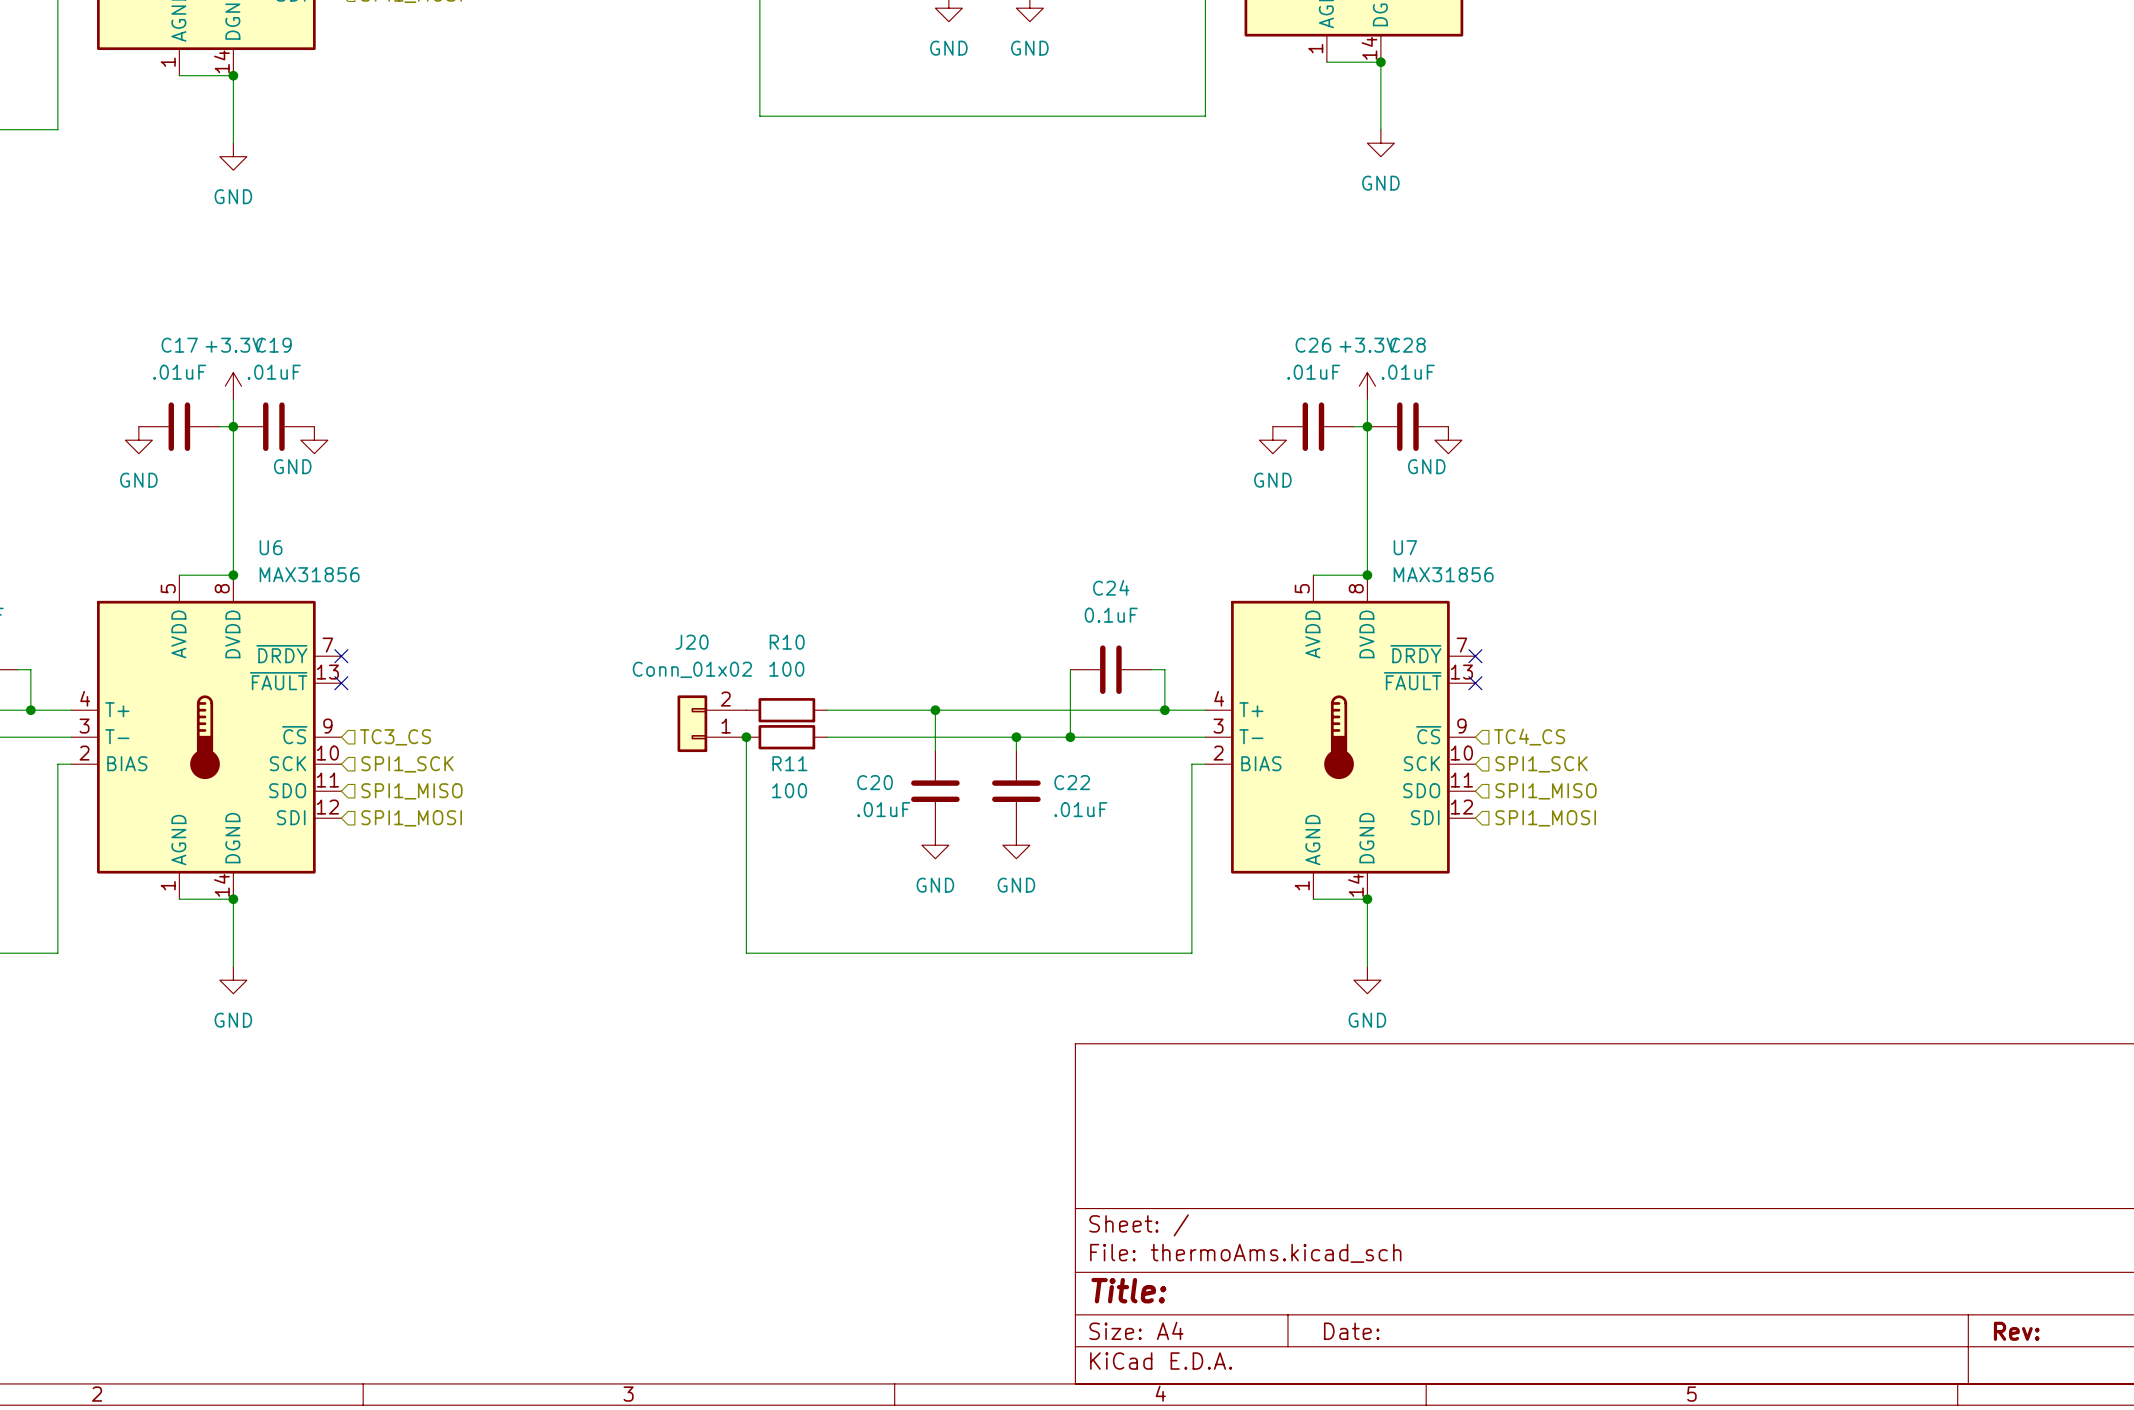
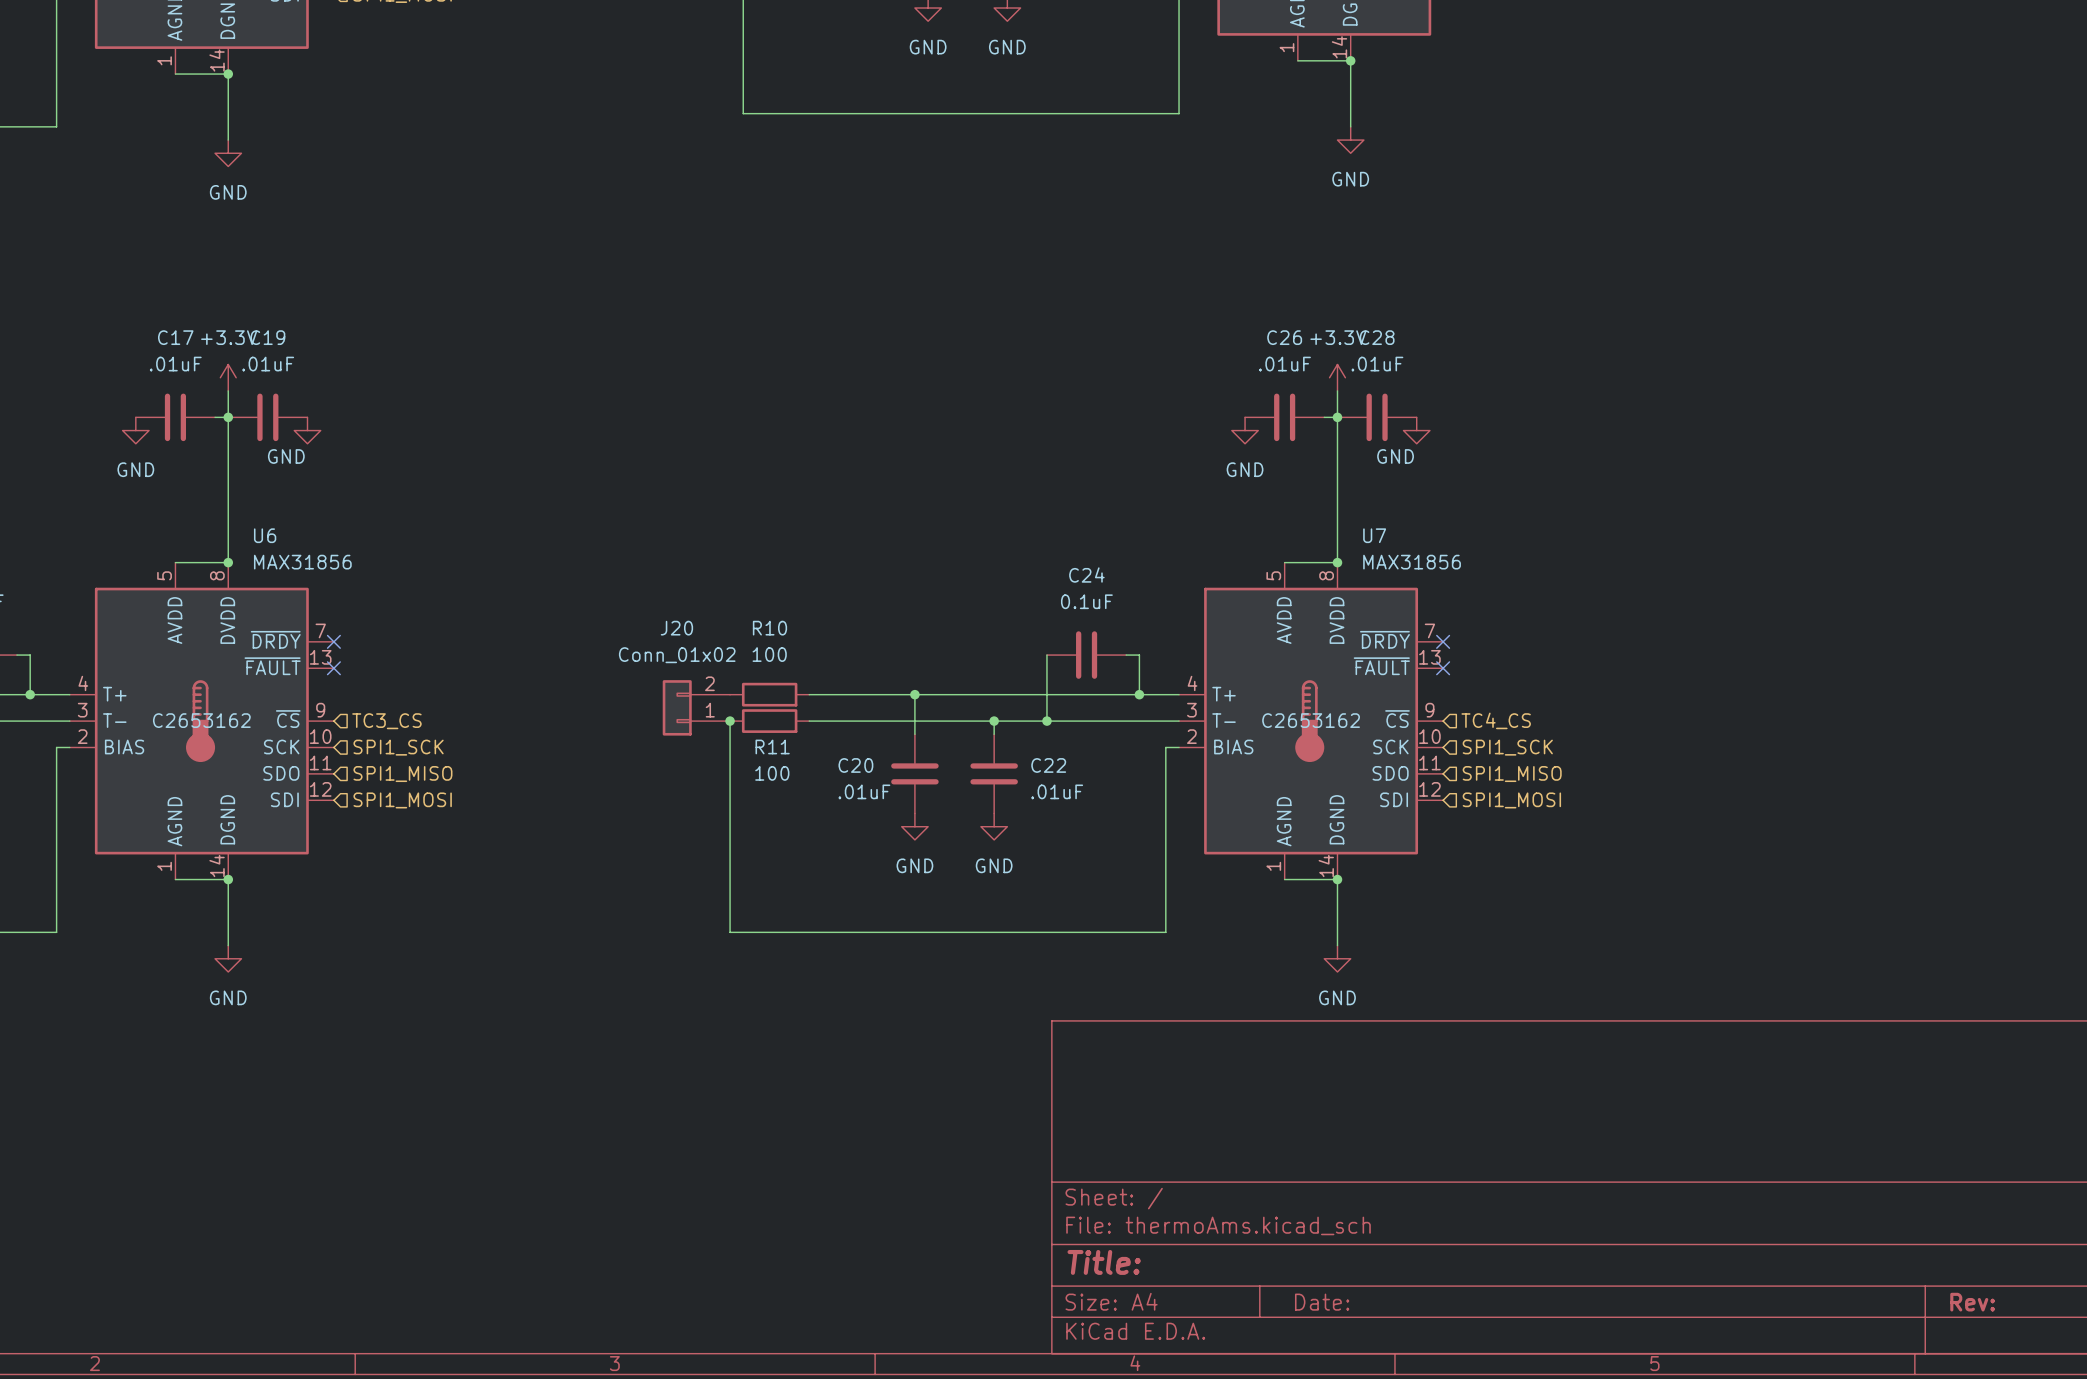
U6 text: none -> C2653162 (201, 720)
U7 text: none -> C2653162 (1311, 720)

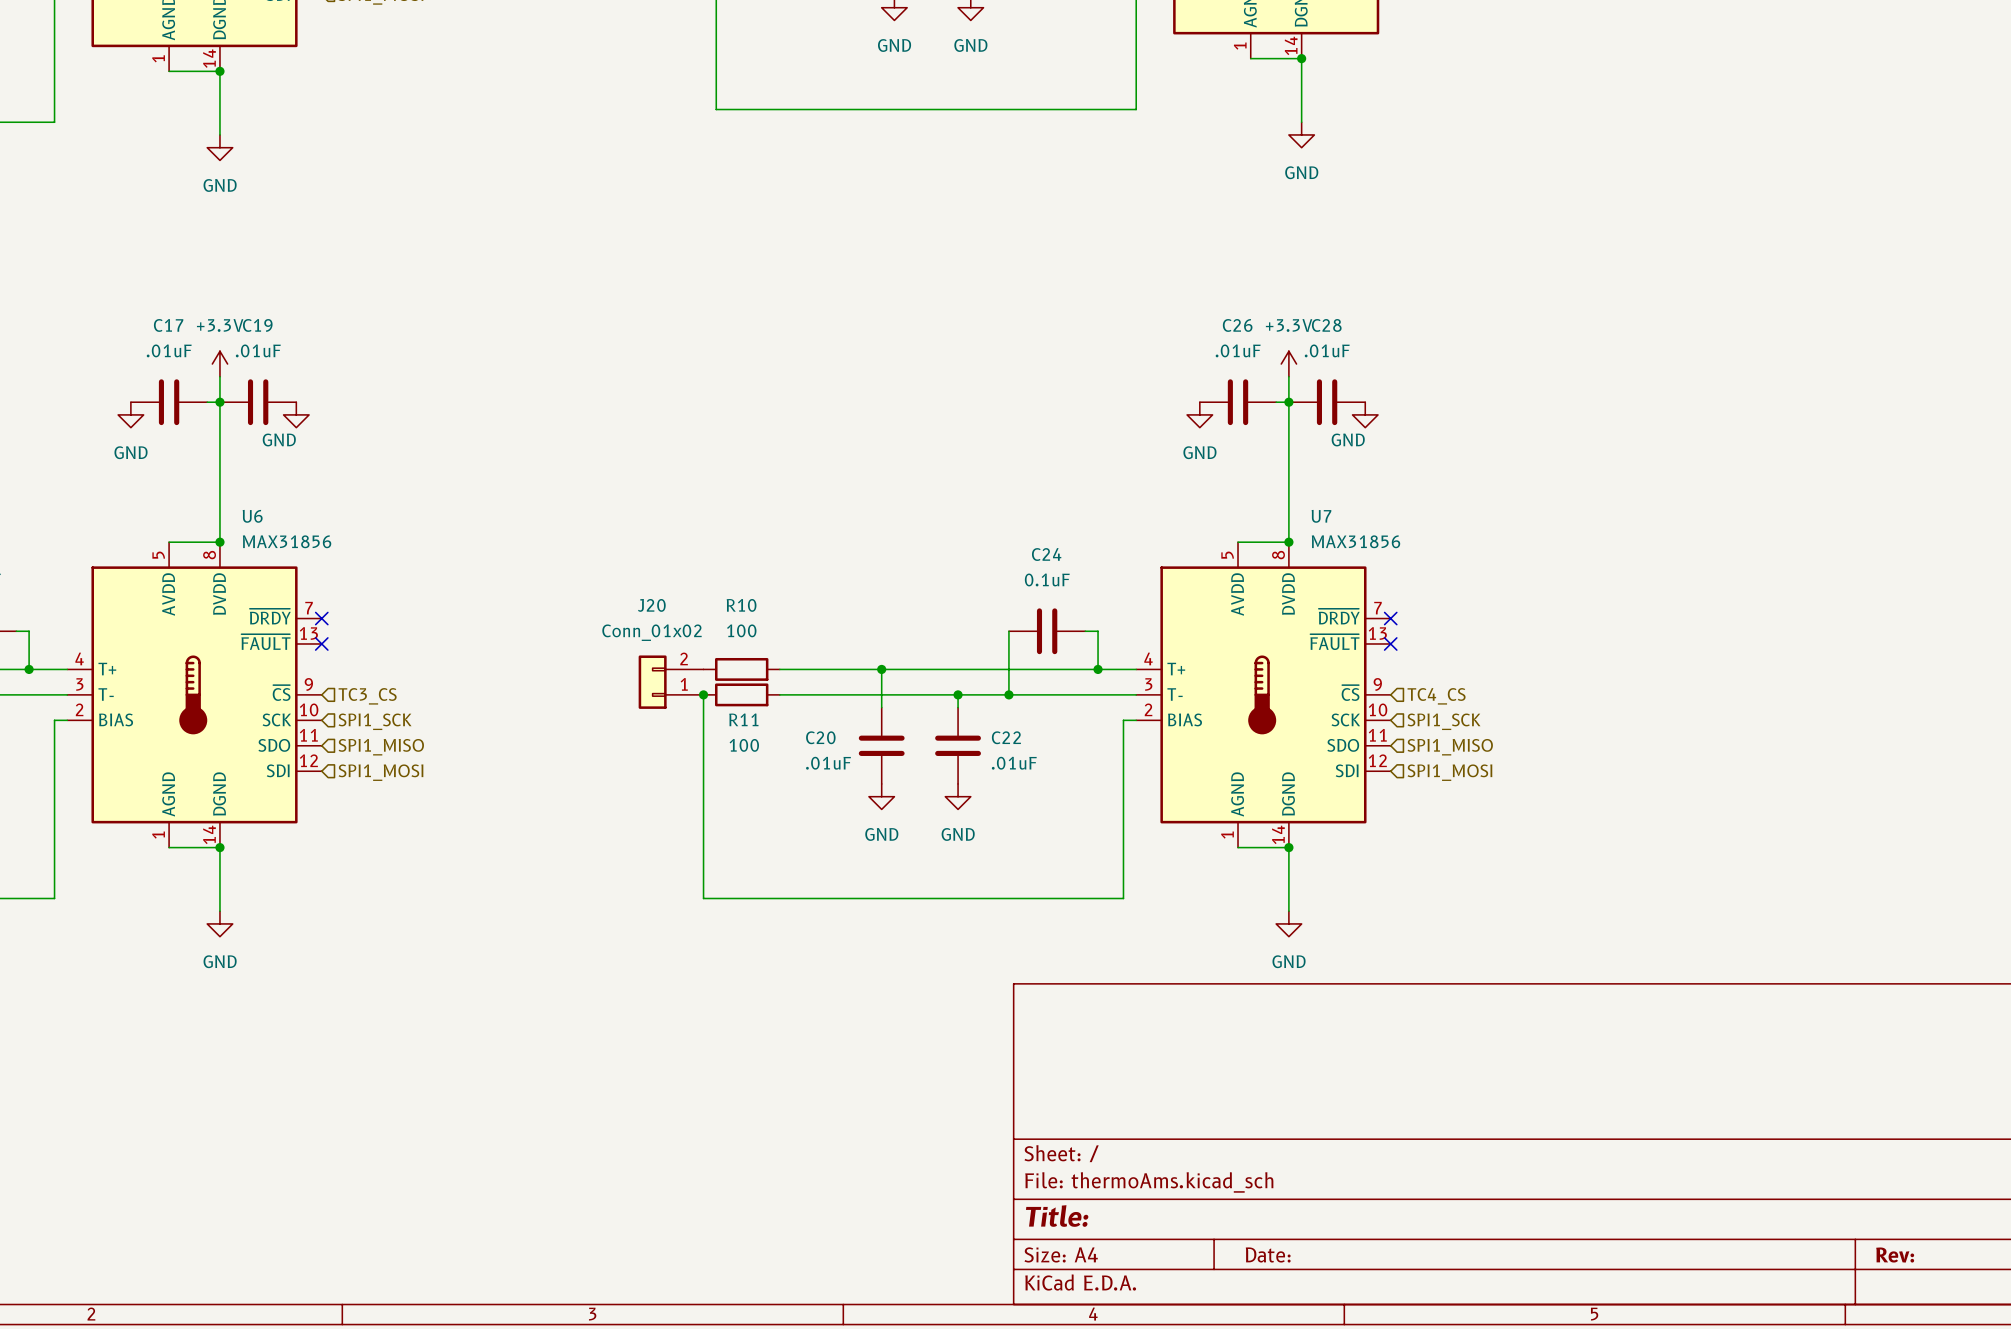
U6 text: C2653162 (201, 720) -> none
U7 text: C2653162 (1311, 720) -> none

